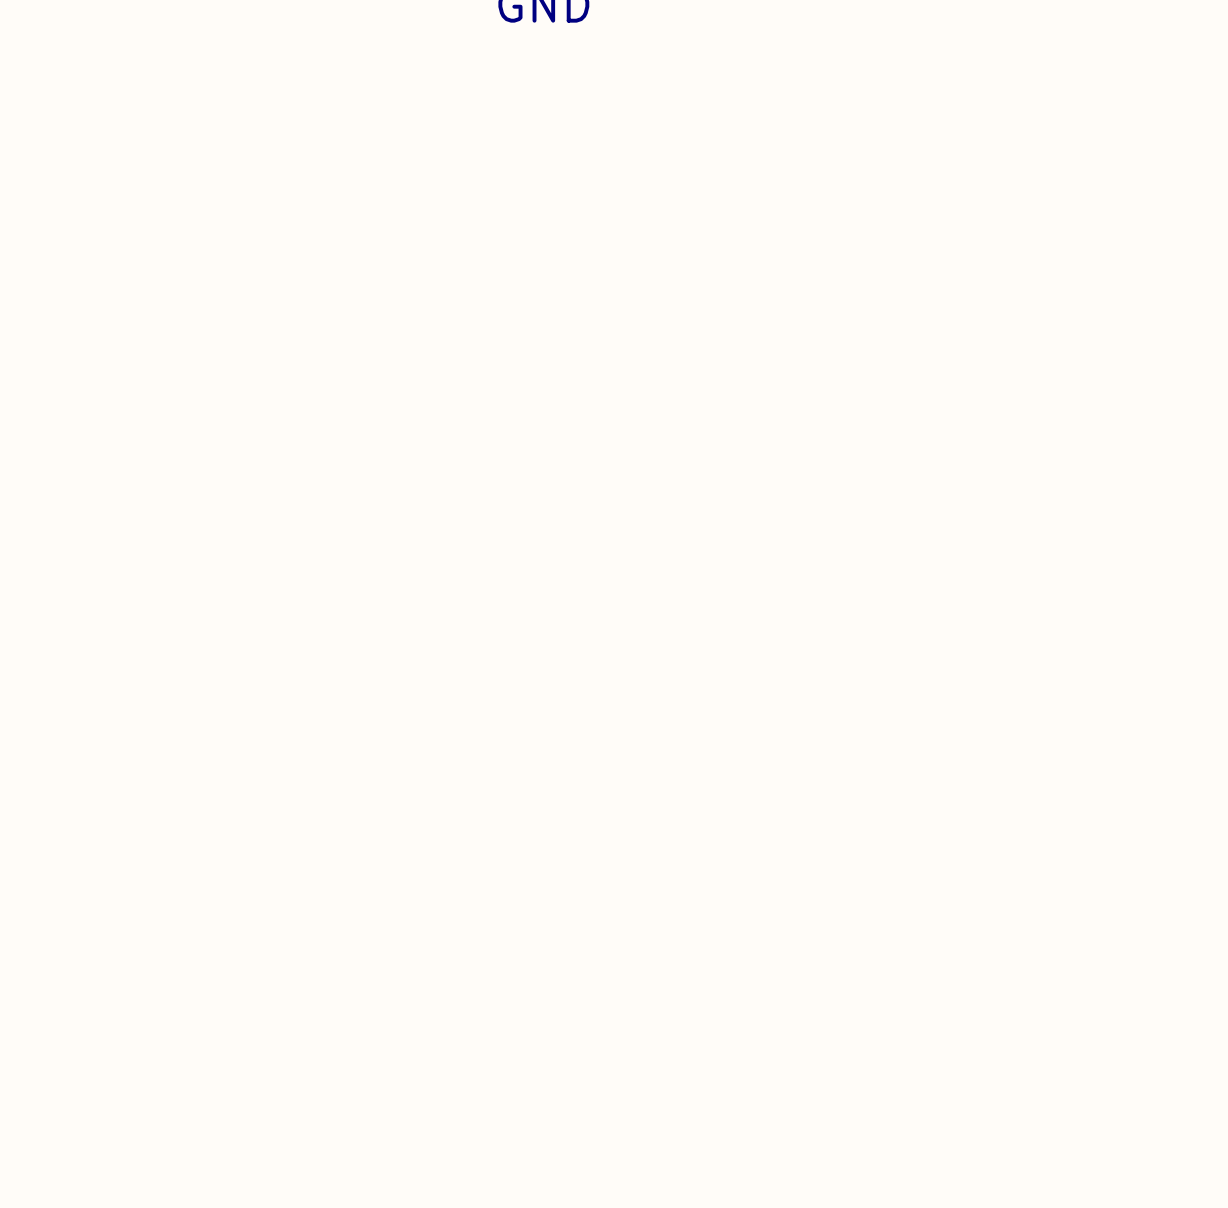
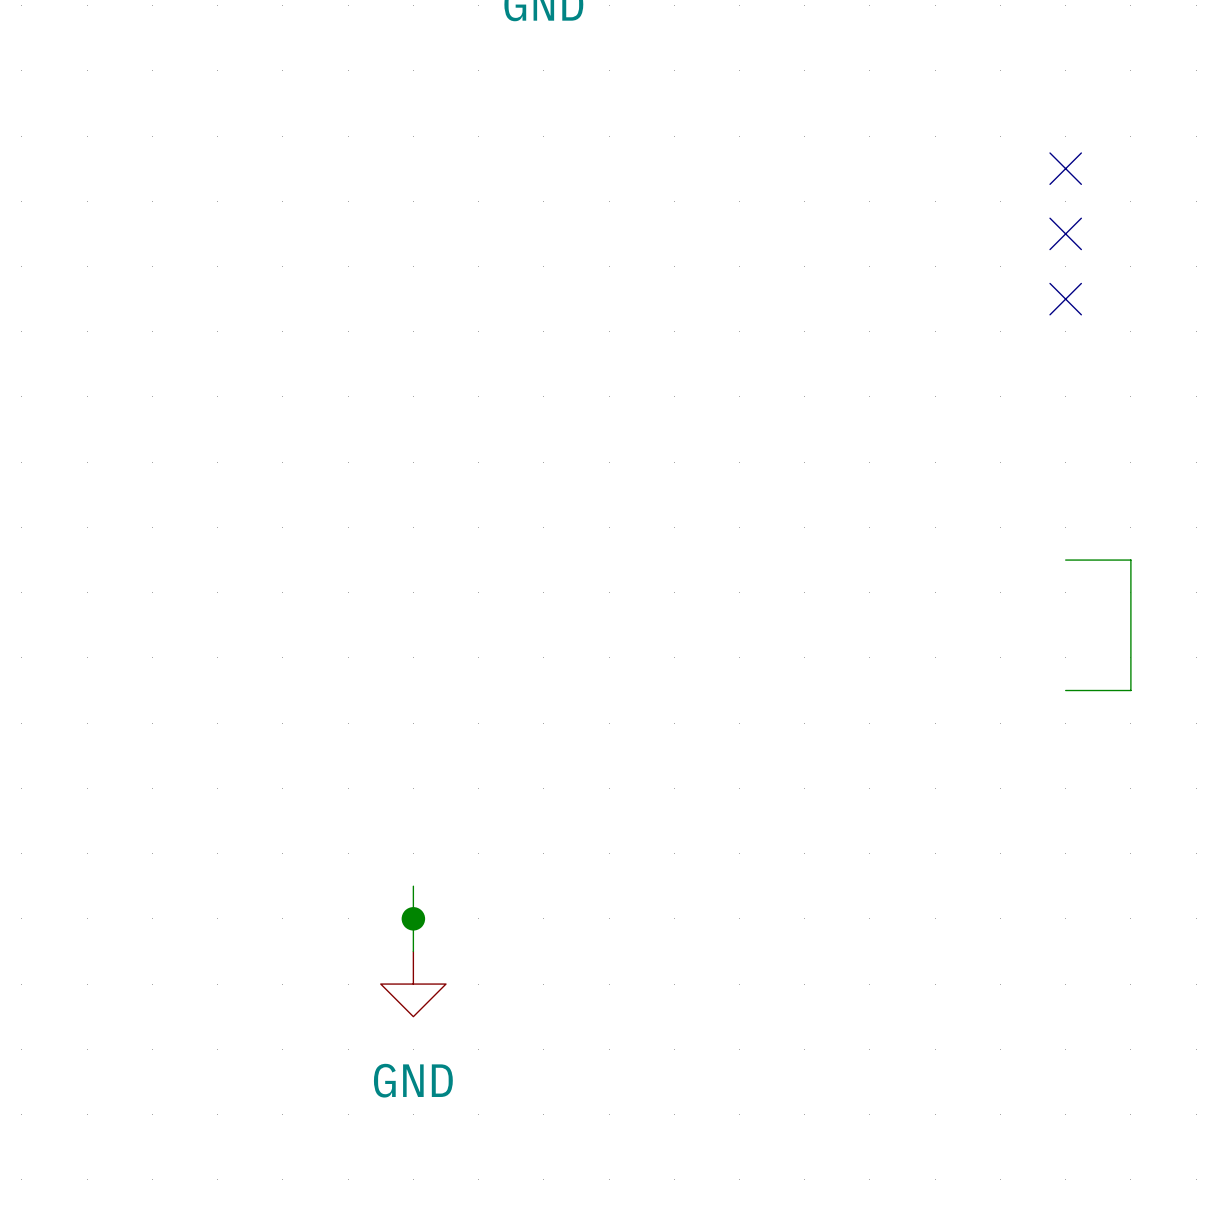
no-connect mark: none -> (1065, 168)
no-connect mark: none -> (1065, 233)
no-connect mark: none -> (1065, 299)
wire: none -> (1065, 560) (1130, 560) (1130, 690) (1065, 690)
wire: none -> (413, 886) (413, 951)
junction: none -> (413, 918)
power symbol: none -> GND (413, 984)

